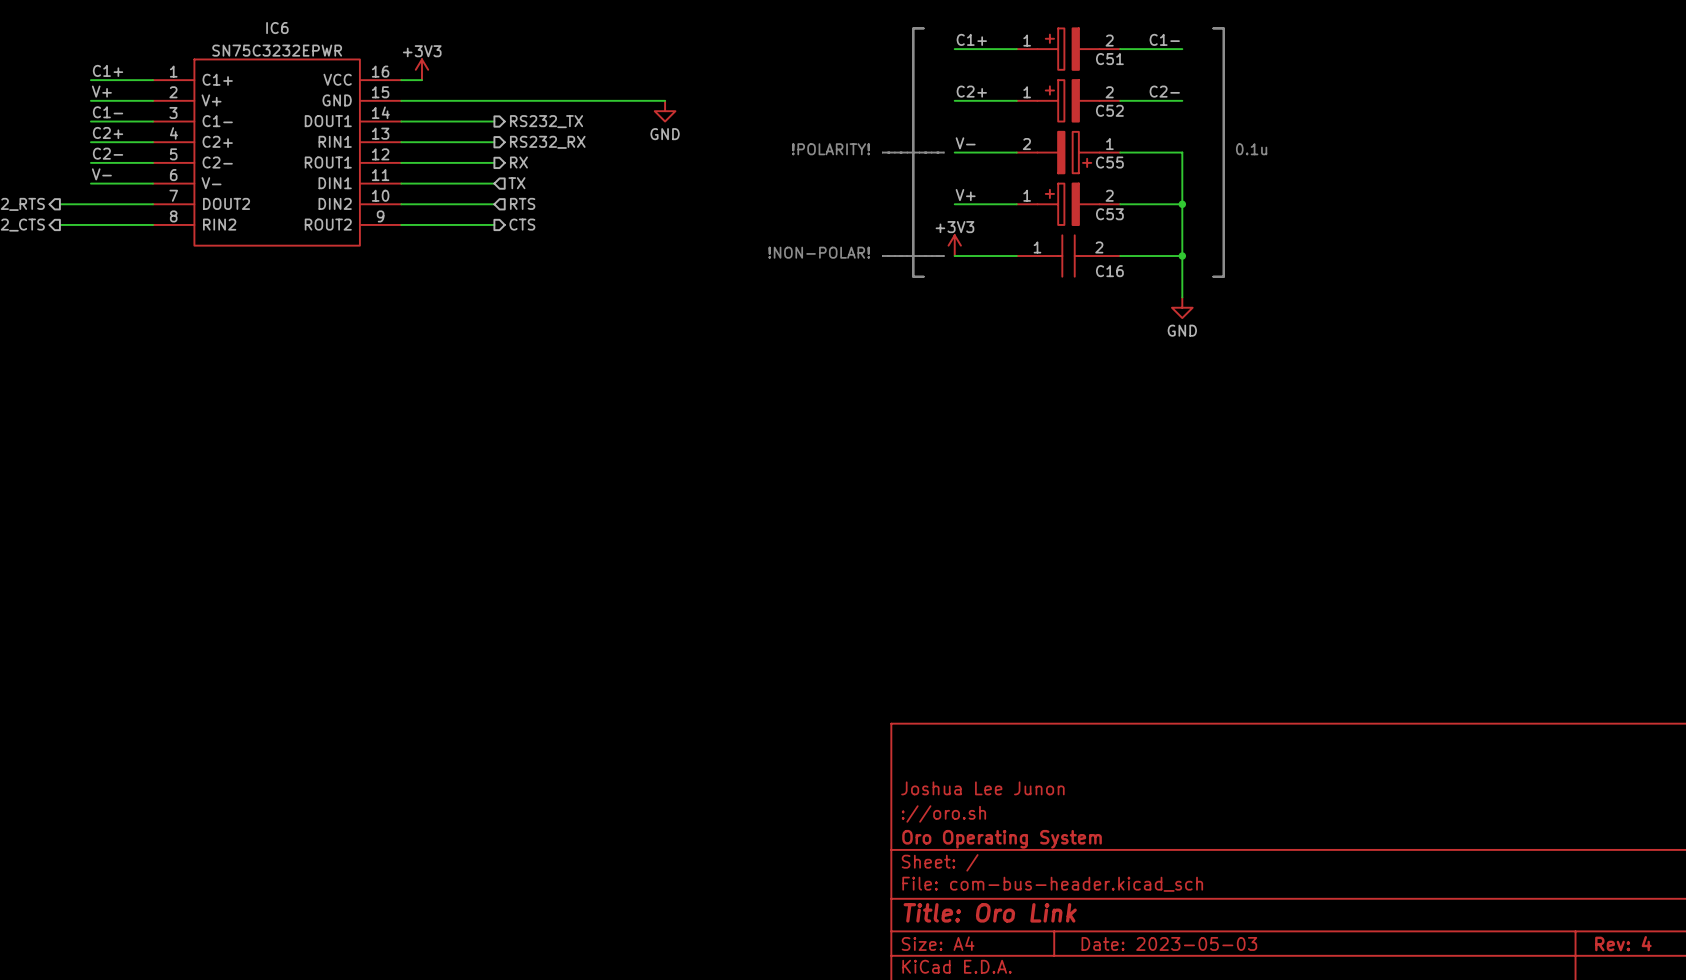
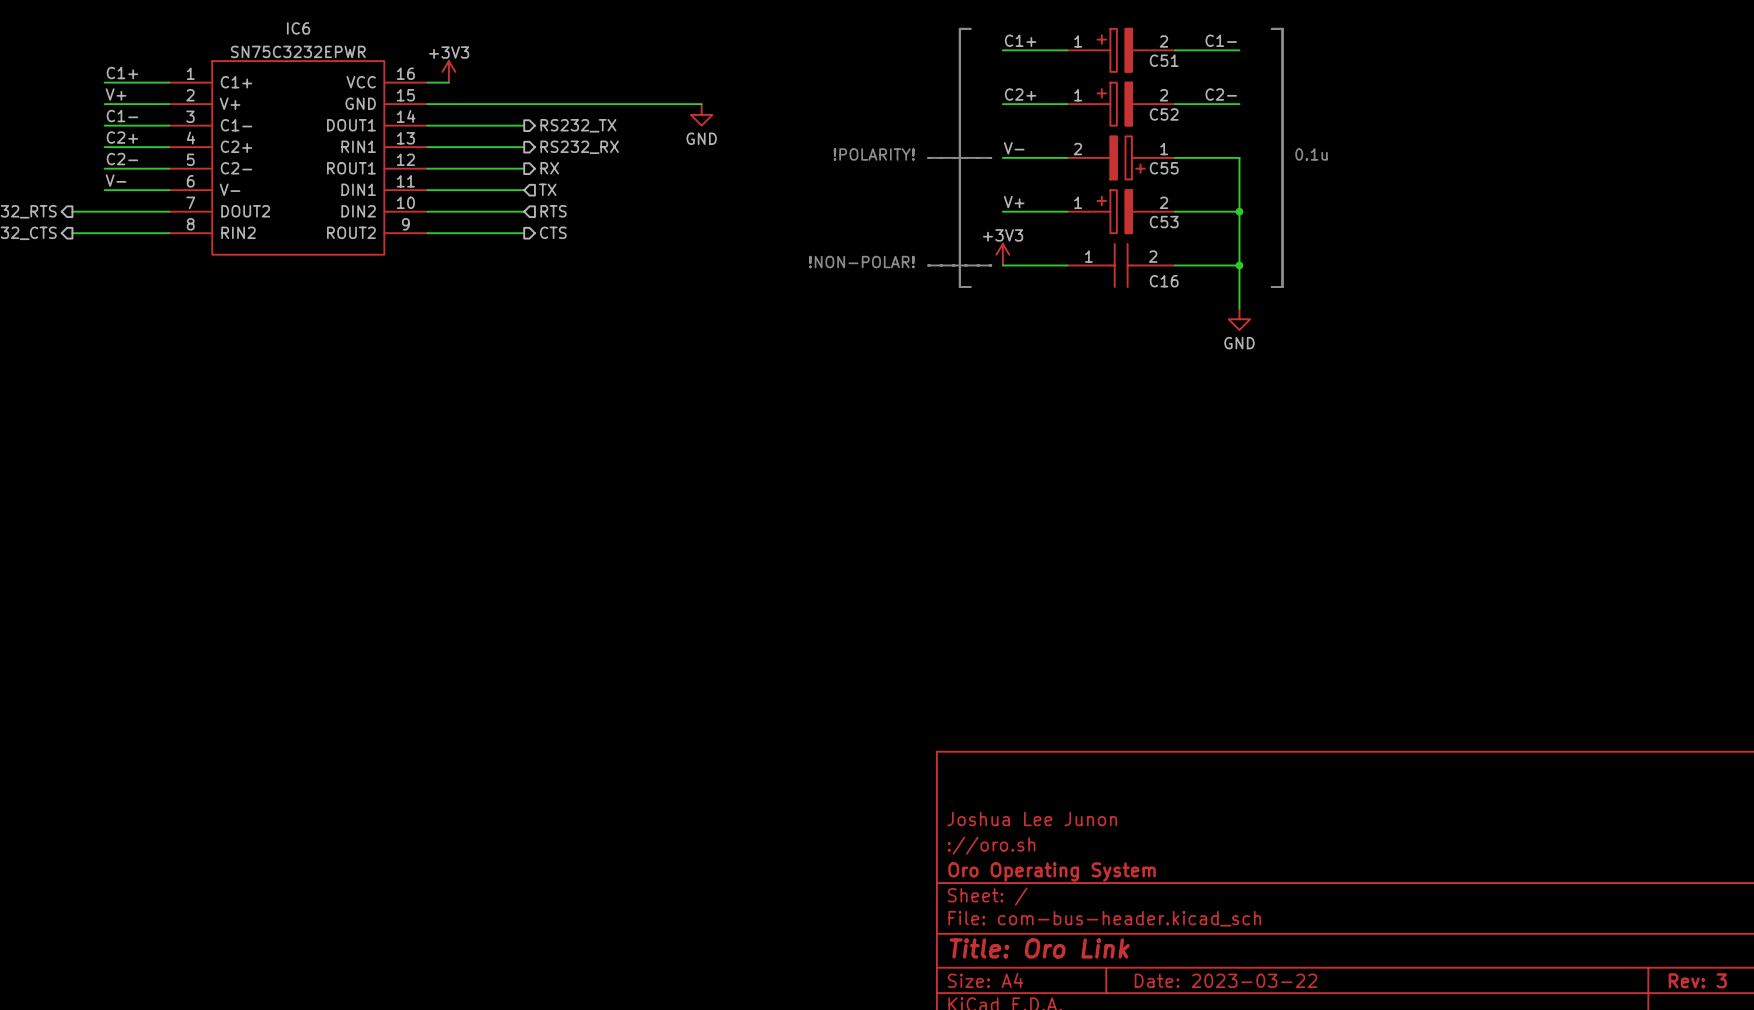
title block: Date: 2023-05-03 (1169, 943) -> Date: 2023-03-22 (1226, 980)
title block: Rev: 4 (1623, 943) -> Rev: 3 (1697, 980)

